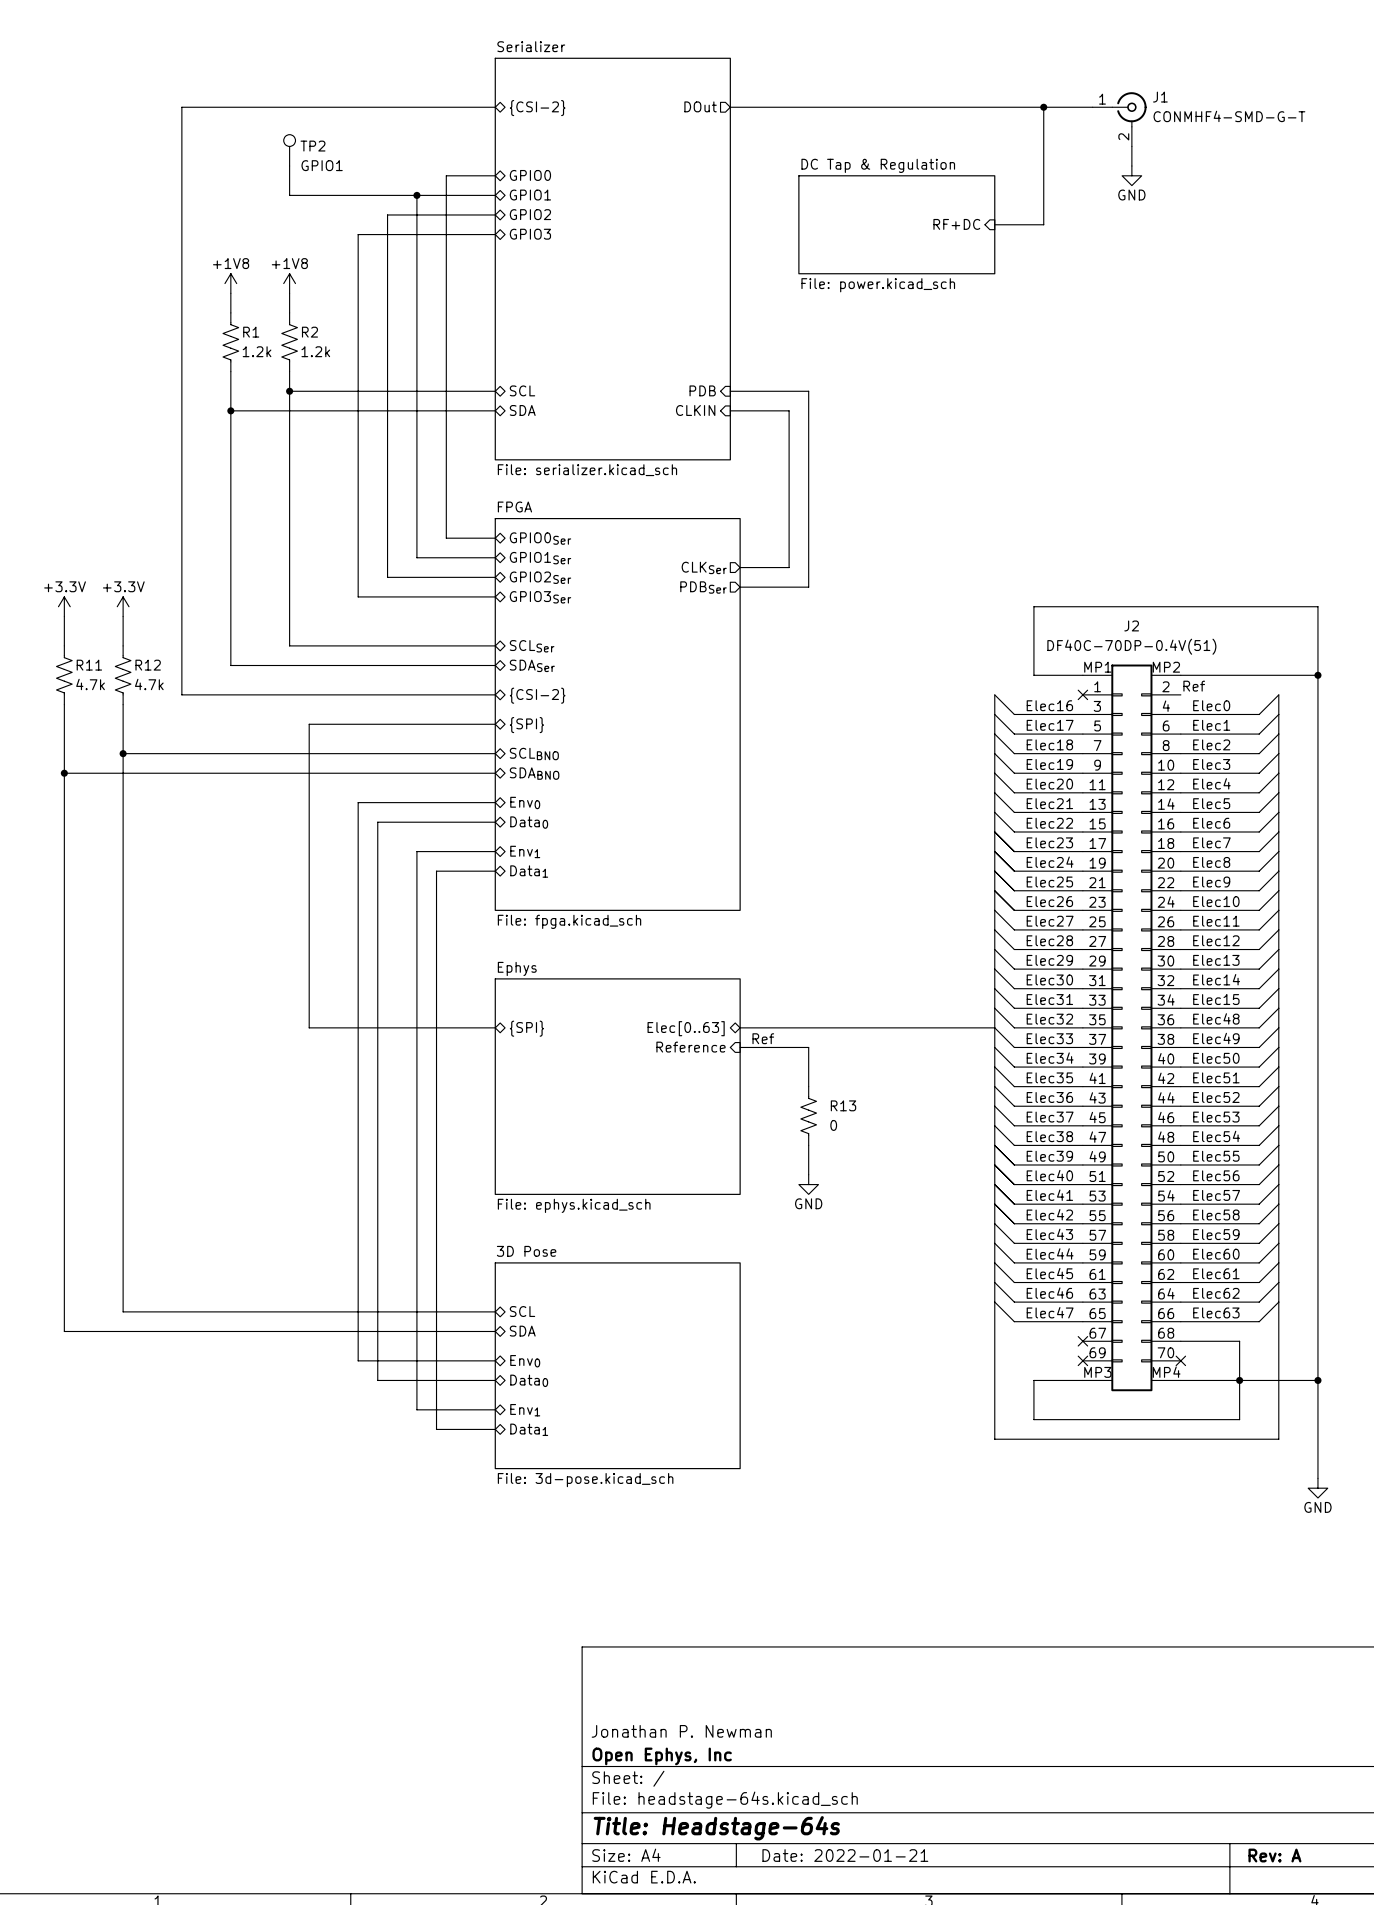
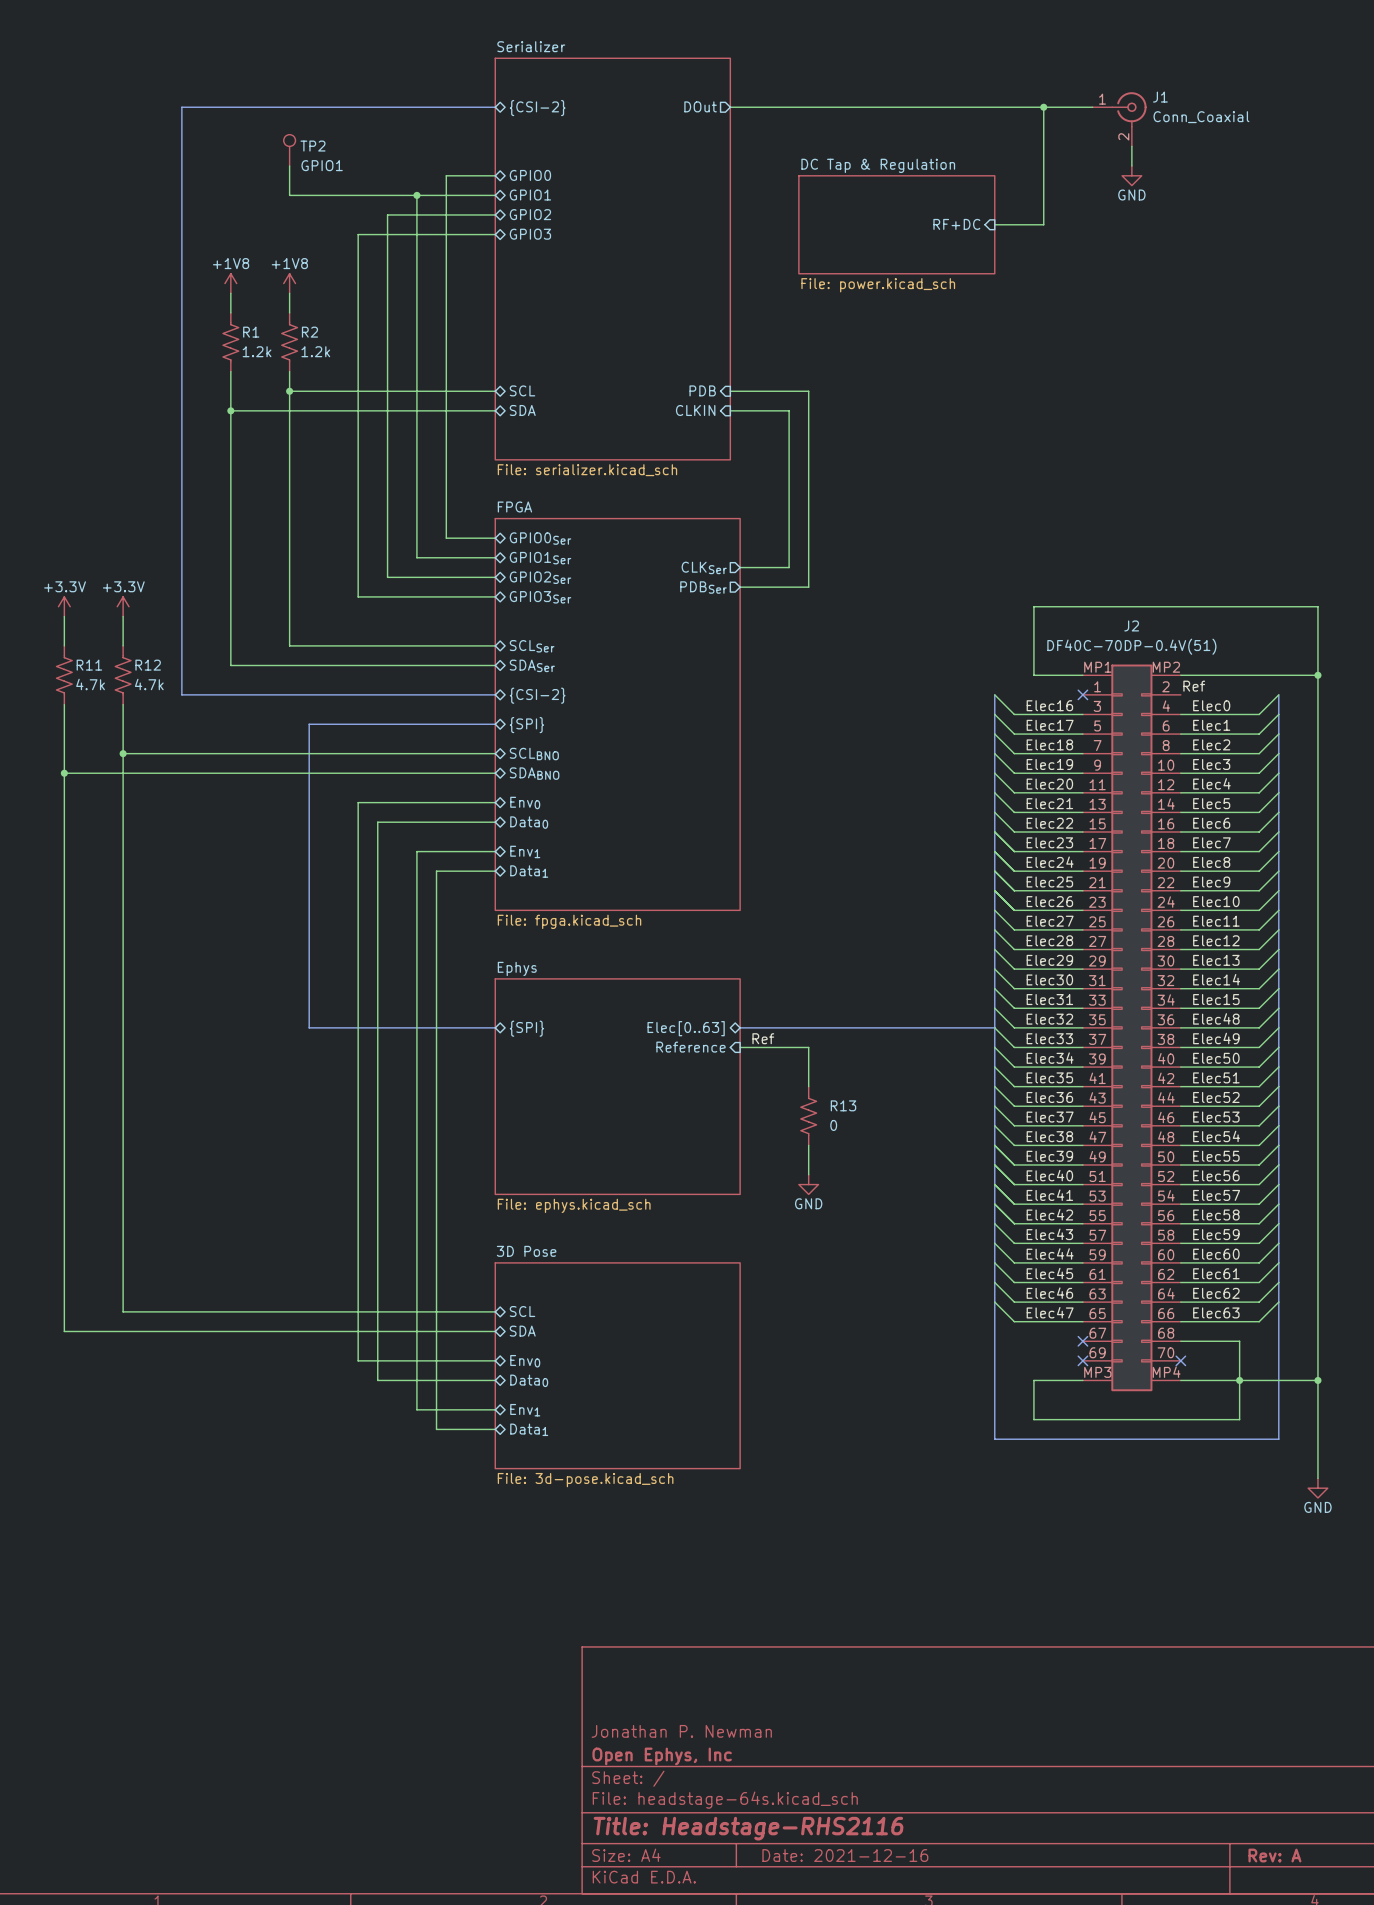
J1 value: CONMHF4-SMD-G-T (1229, 116) -> Conn_Coaxial (1201, 117)
title block: Title: Headstage-64s (716, 1828) -> Title: Headstage-RHS2116 (748, 1828)
title block: Date: 2022-01-21 (845, 1855) -> Date: 2021-12-16 (845, 1855)

